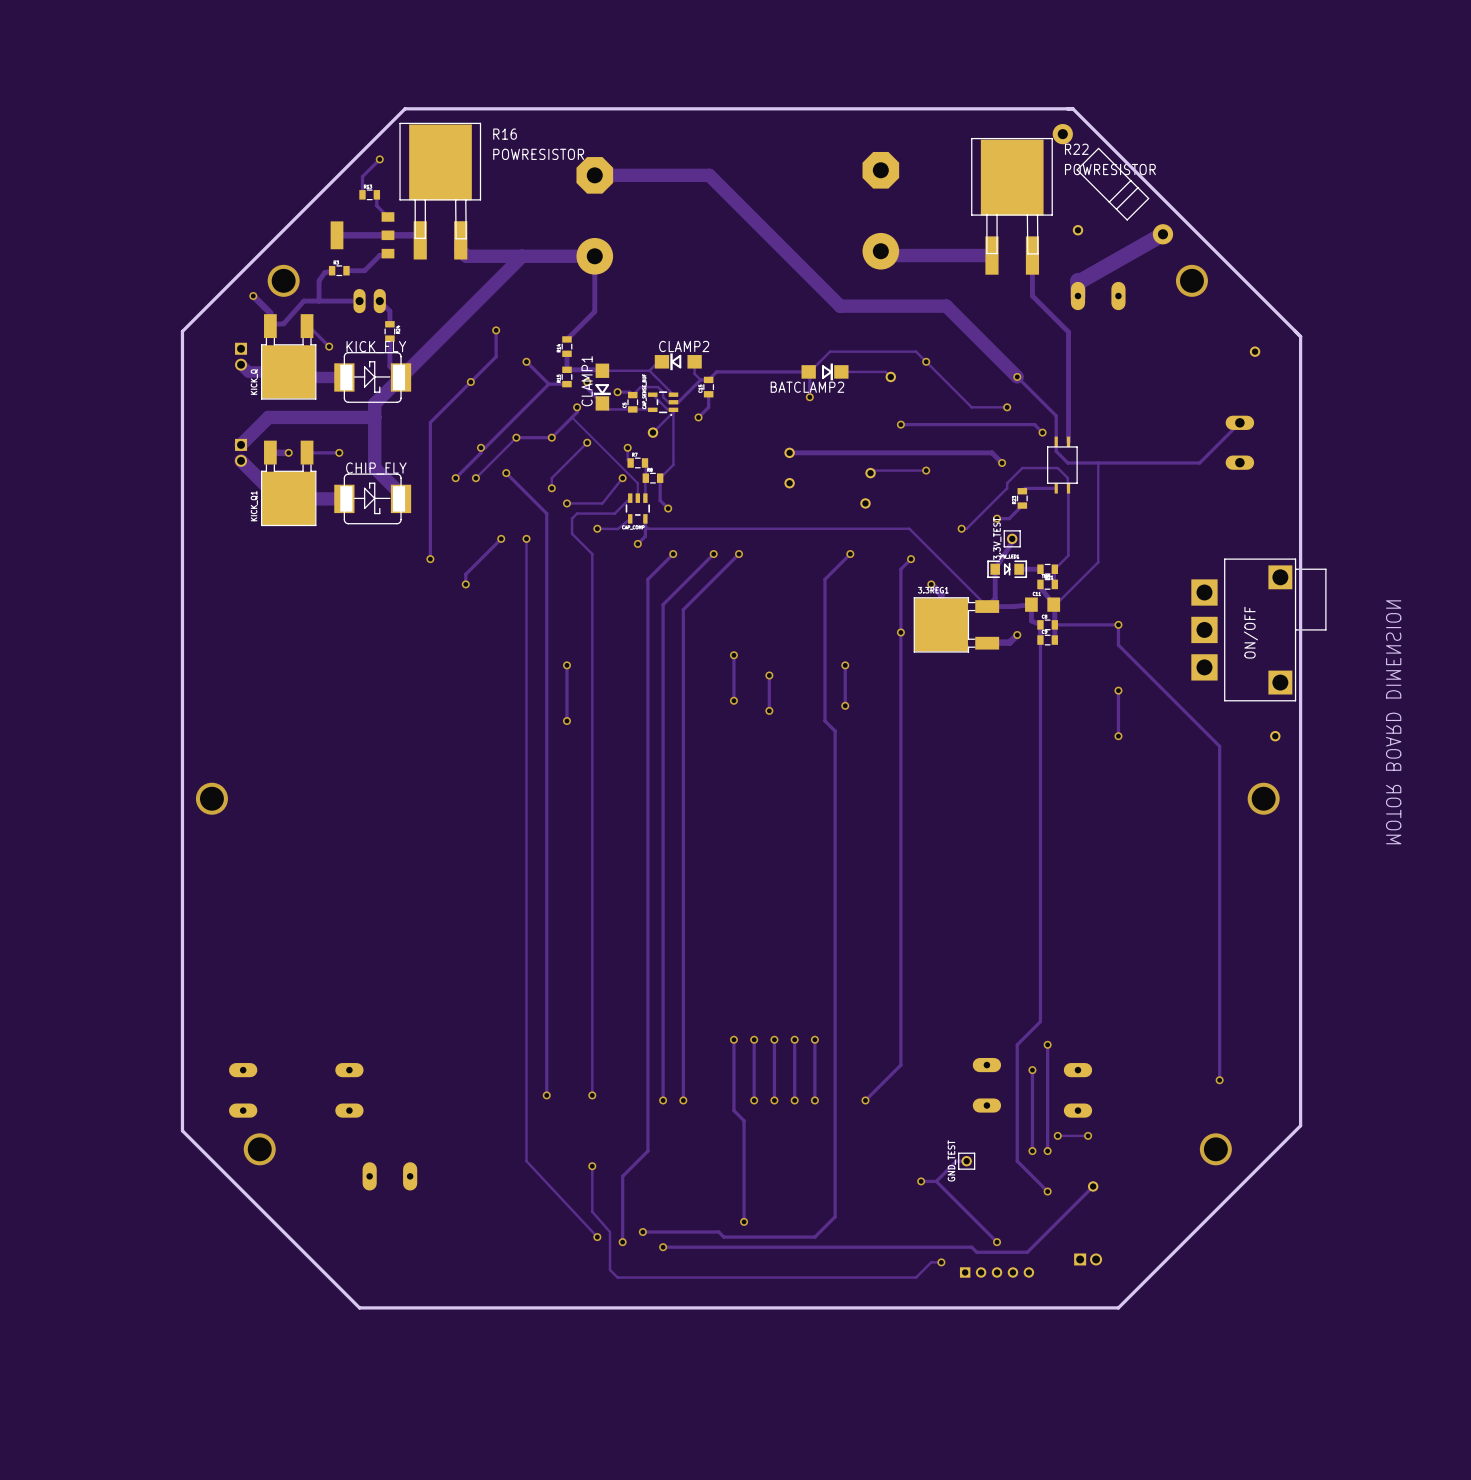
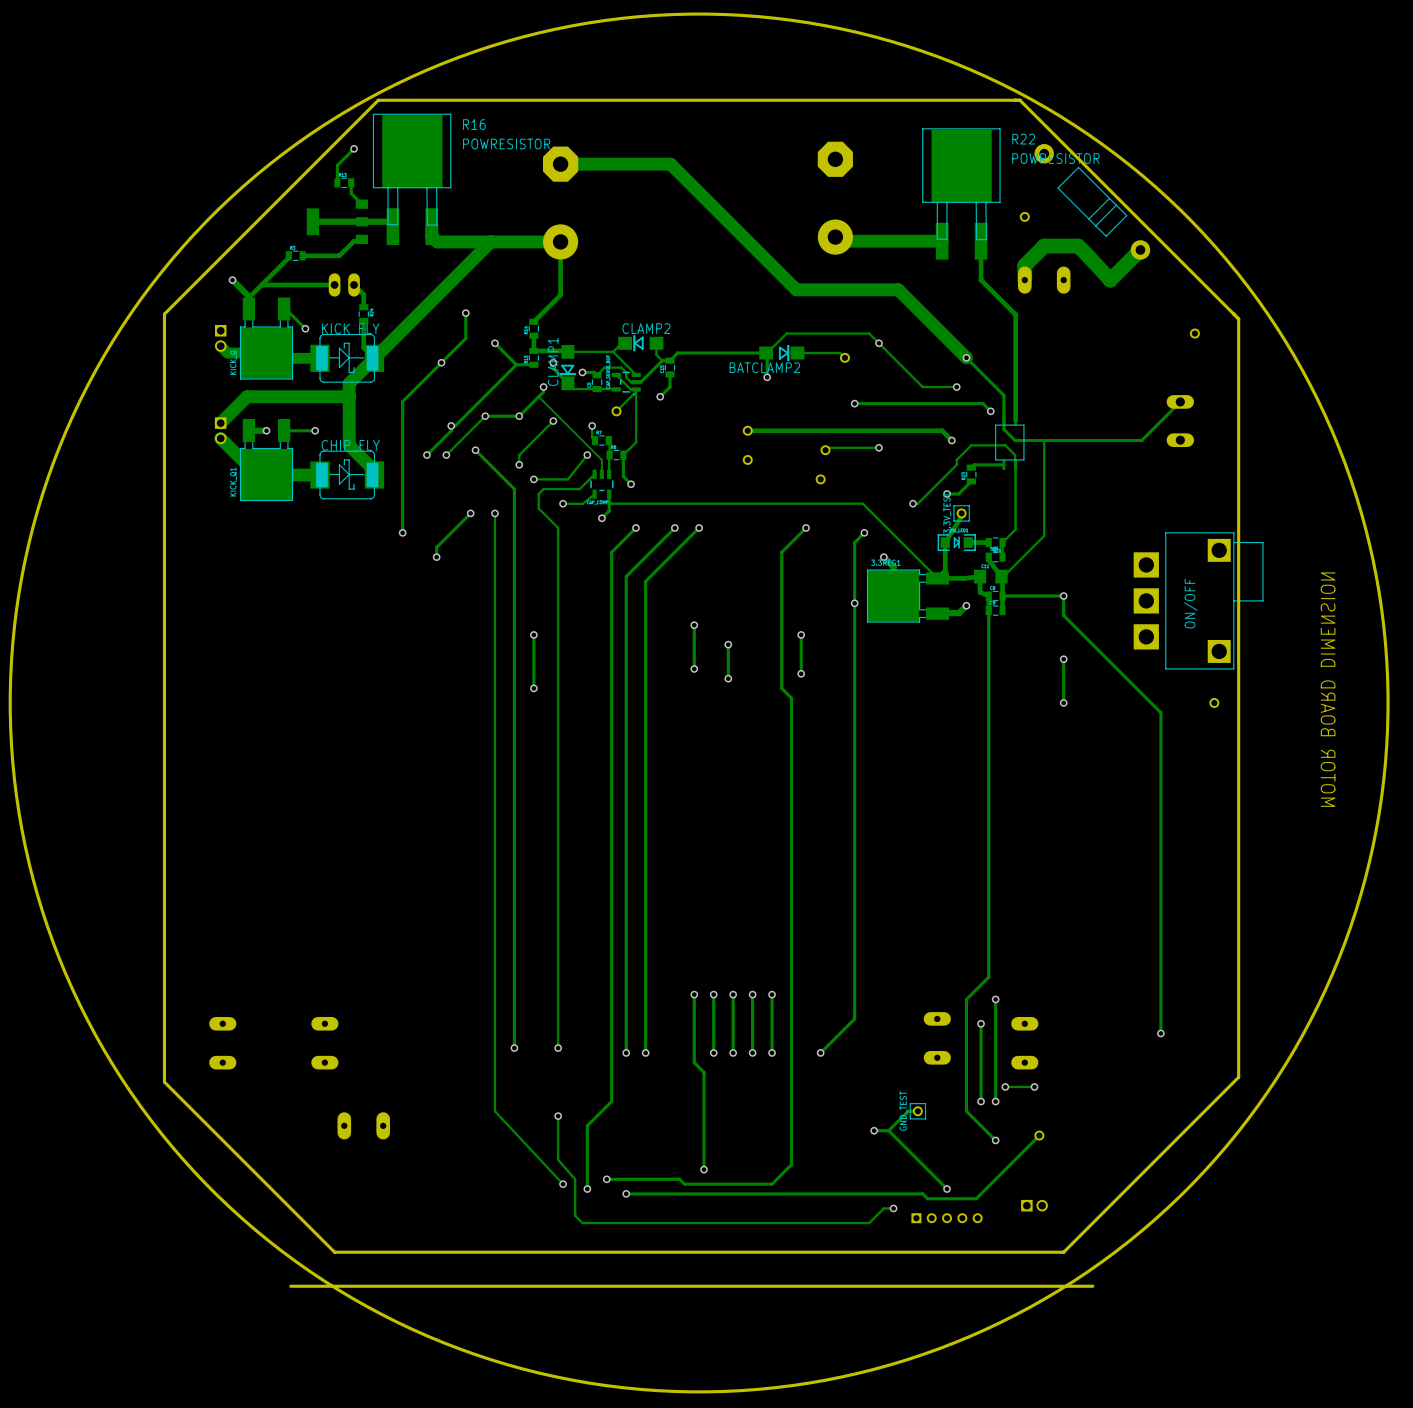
round board edge: none -> [8, 12, 1390, 1394]
part position: (1112, 184) -> (1092, 201)
track: (1162, 234) (1077, 280) -> (1140, 249) (1110, 280) (1078, 246) (1044, 246) (1024, 265)
track: none -> (288, 255) (248, 297) (248, 308)
track: (332, 270) (324, 272) (319, 280) (319, 301) -> none
part position: (339, 270) -> (295, 255)
track: none -> (322, 255) (302, 255)
via: (283, 280) -> none
via: (1191, 280) -> none
track: (303, 301) (283, 323) (270, 324) -> (281, 284) (261, 284)
via: (211, 798) -> none
via: (1263, 798) -> none
via: (259, 1149) -> none
via: (1215, 1149) -> none
board edge: none -> (1092, 1286) (290, 1286)

